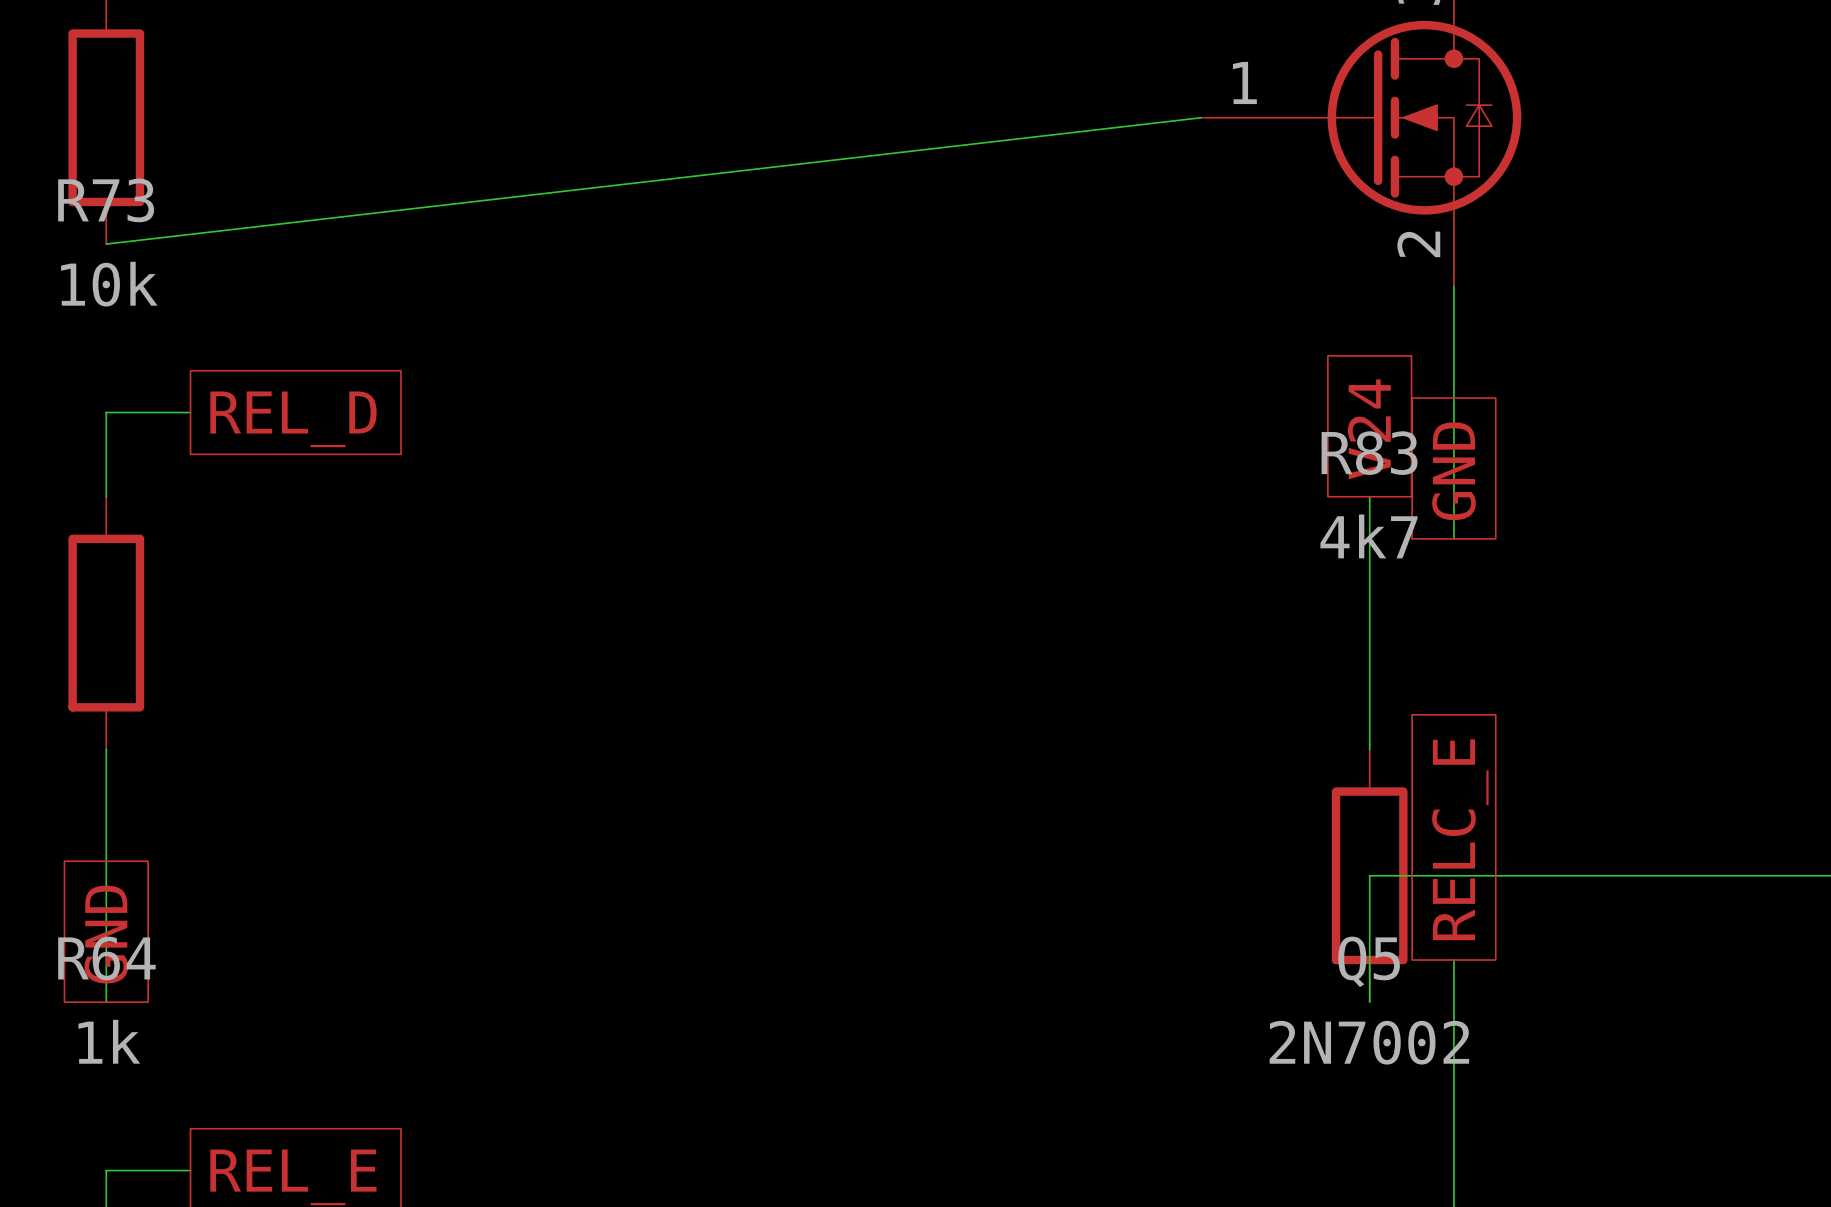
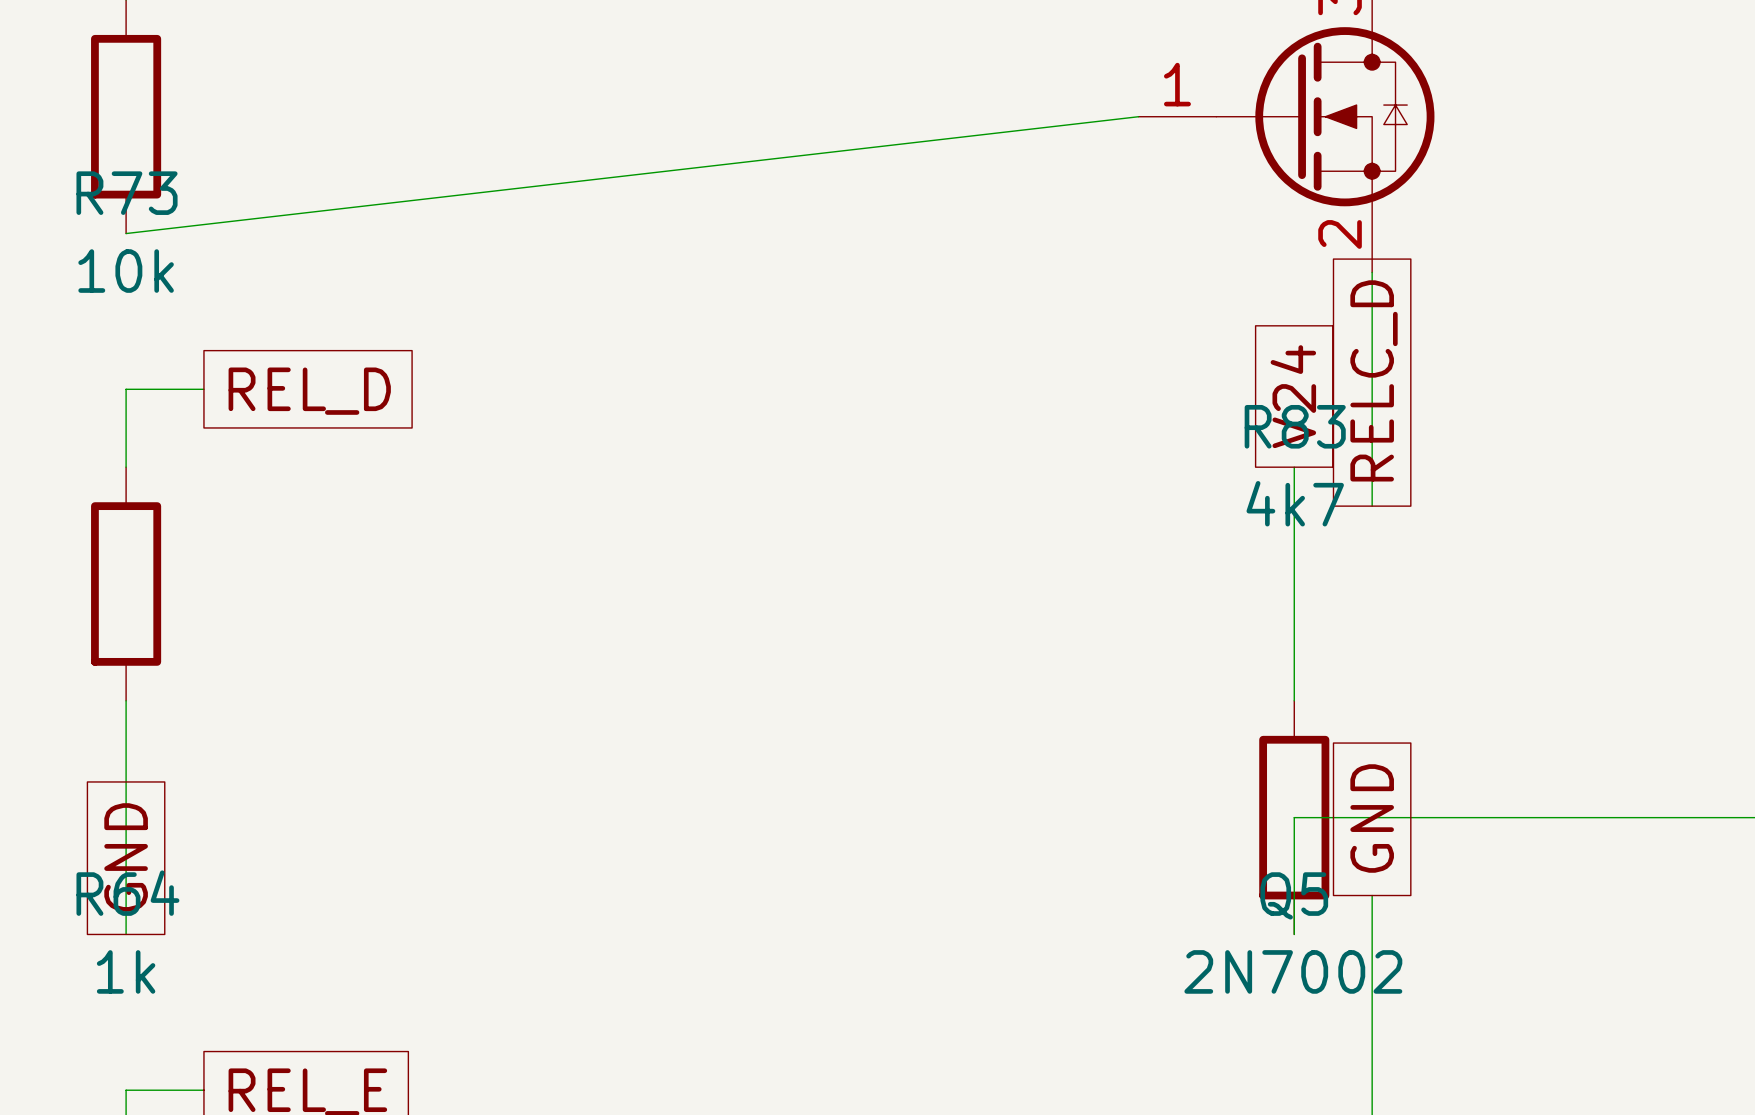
global label: GND (1453, 471) -> RELC_D (1374, 380)
global label: RELC_E (1460, 839) -> GND (1372, 818)

